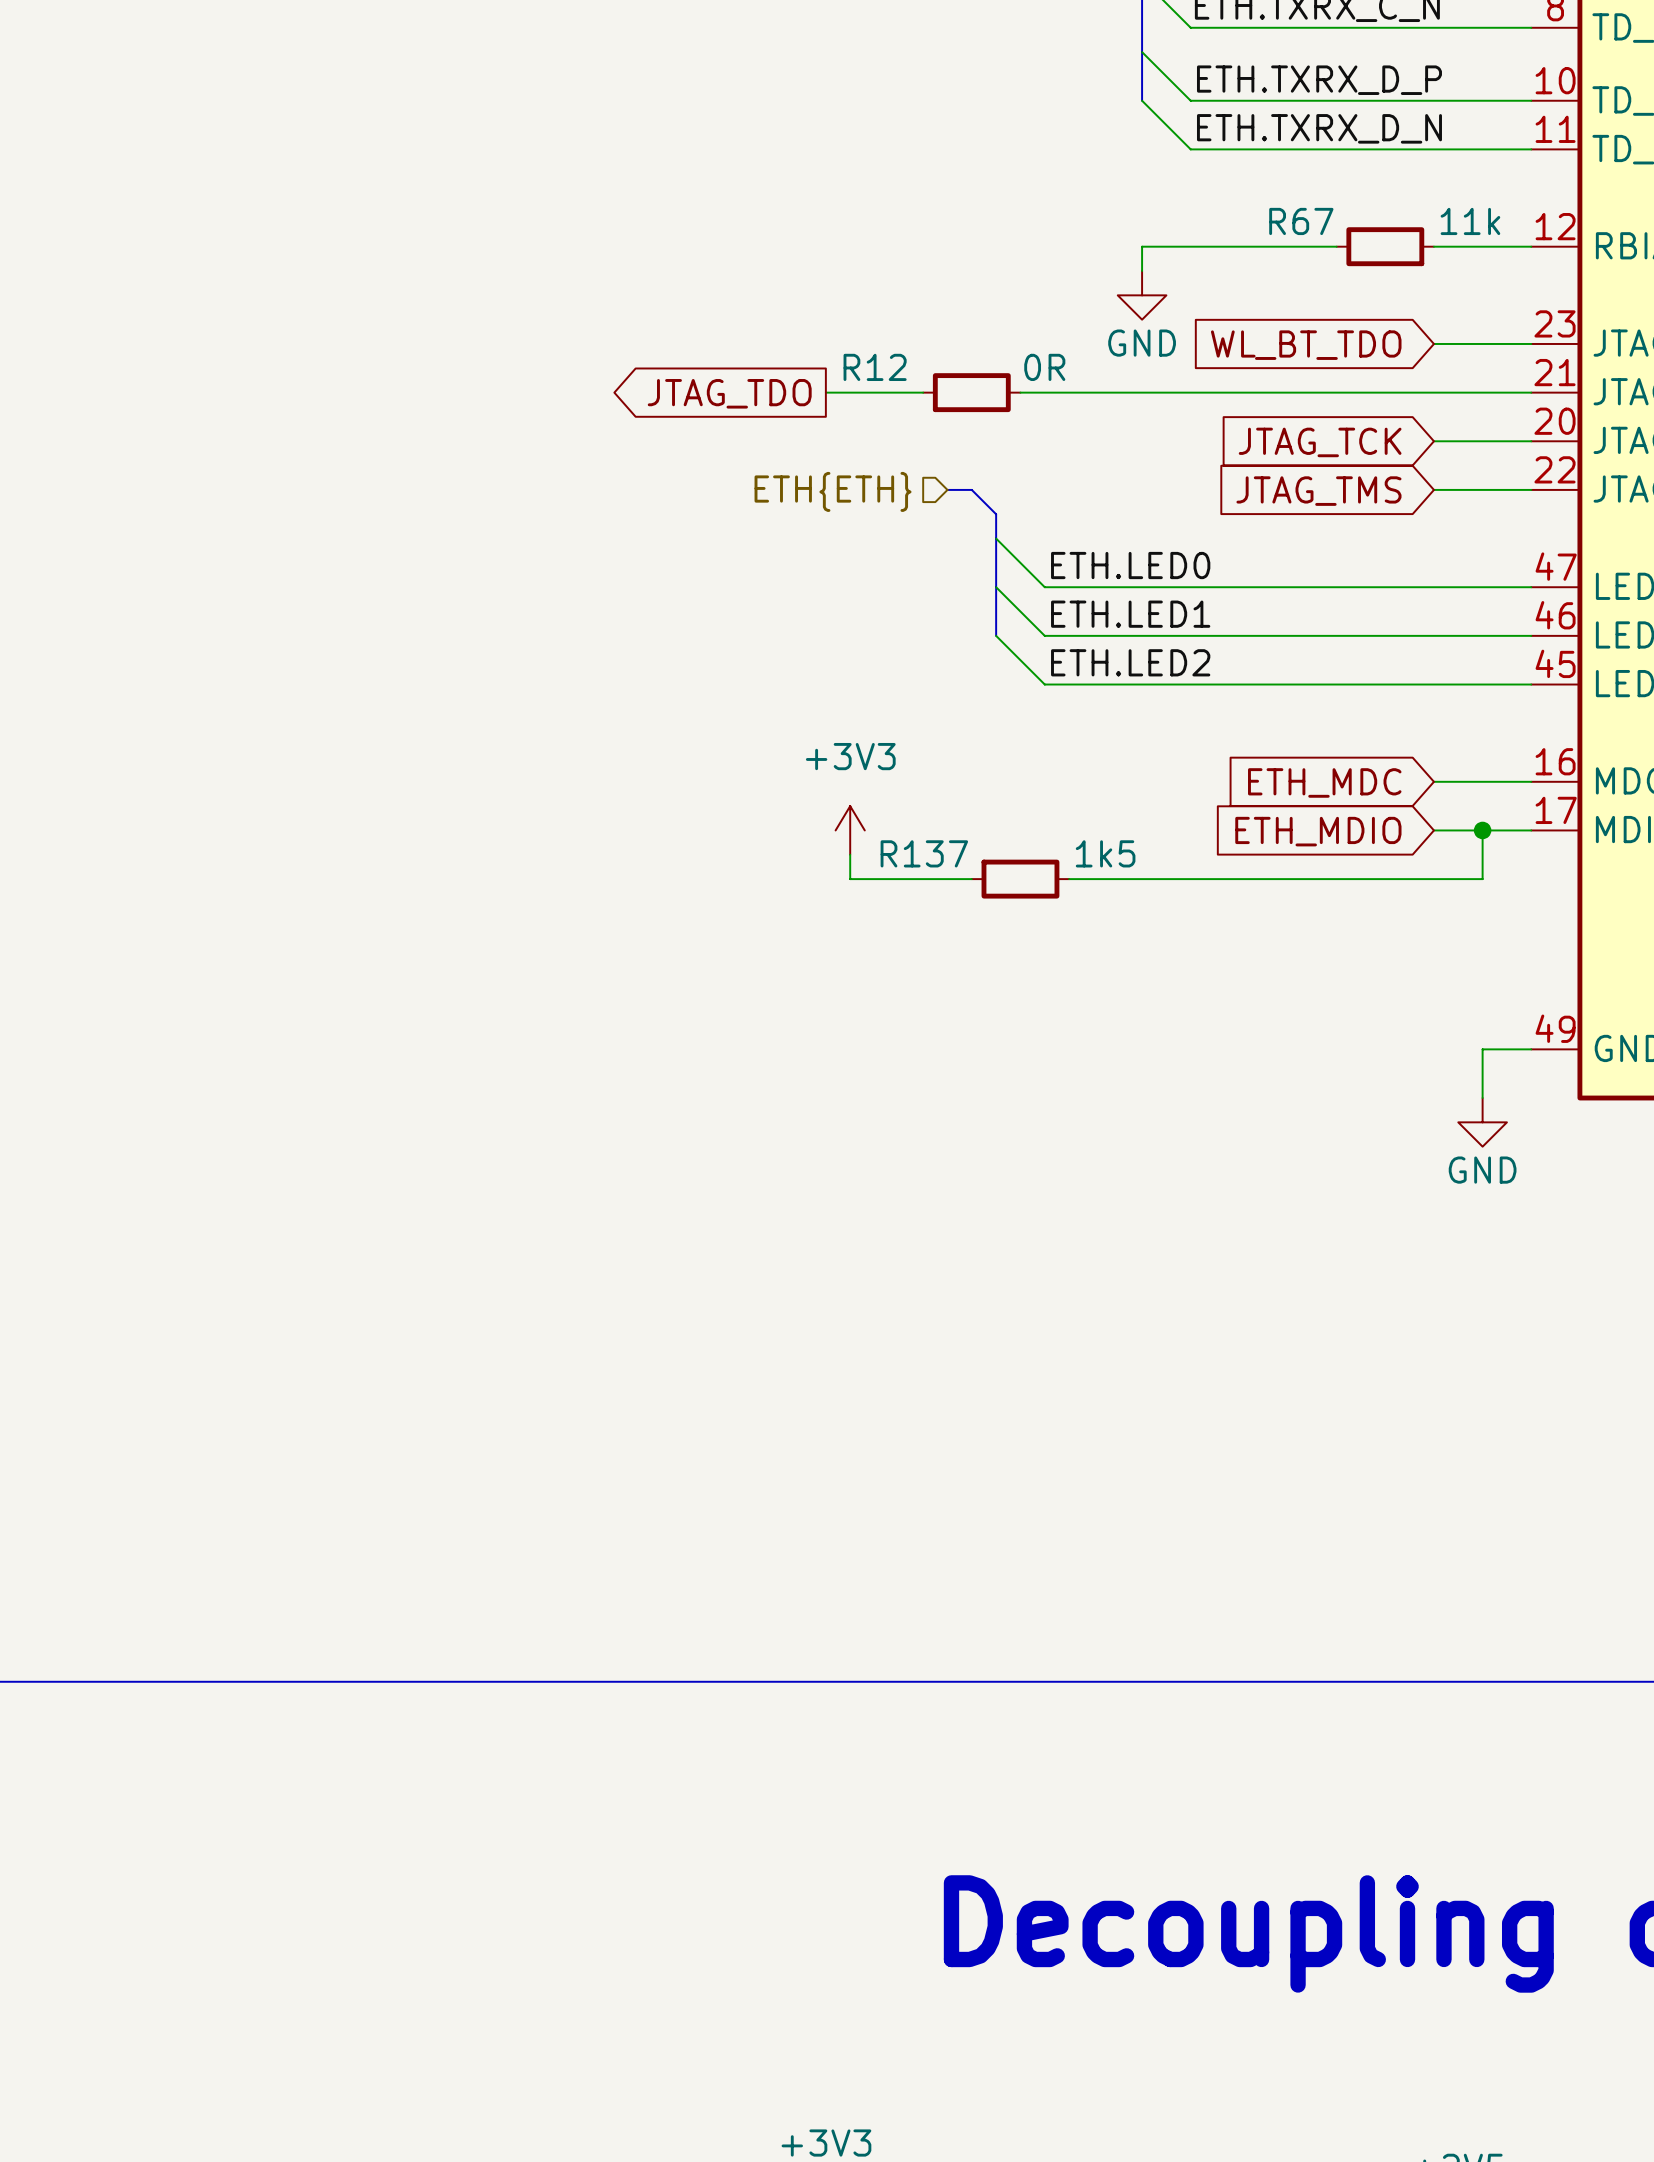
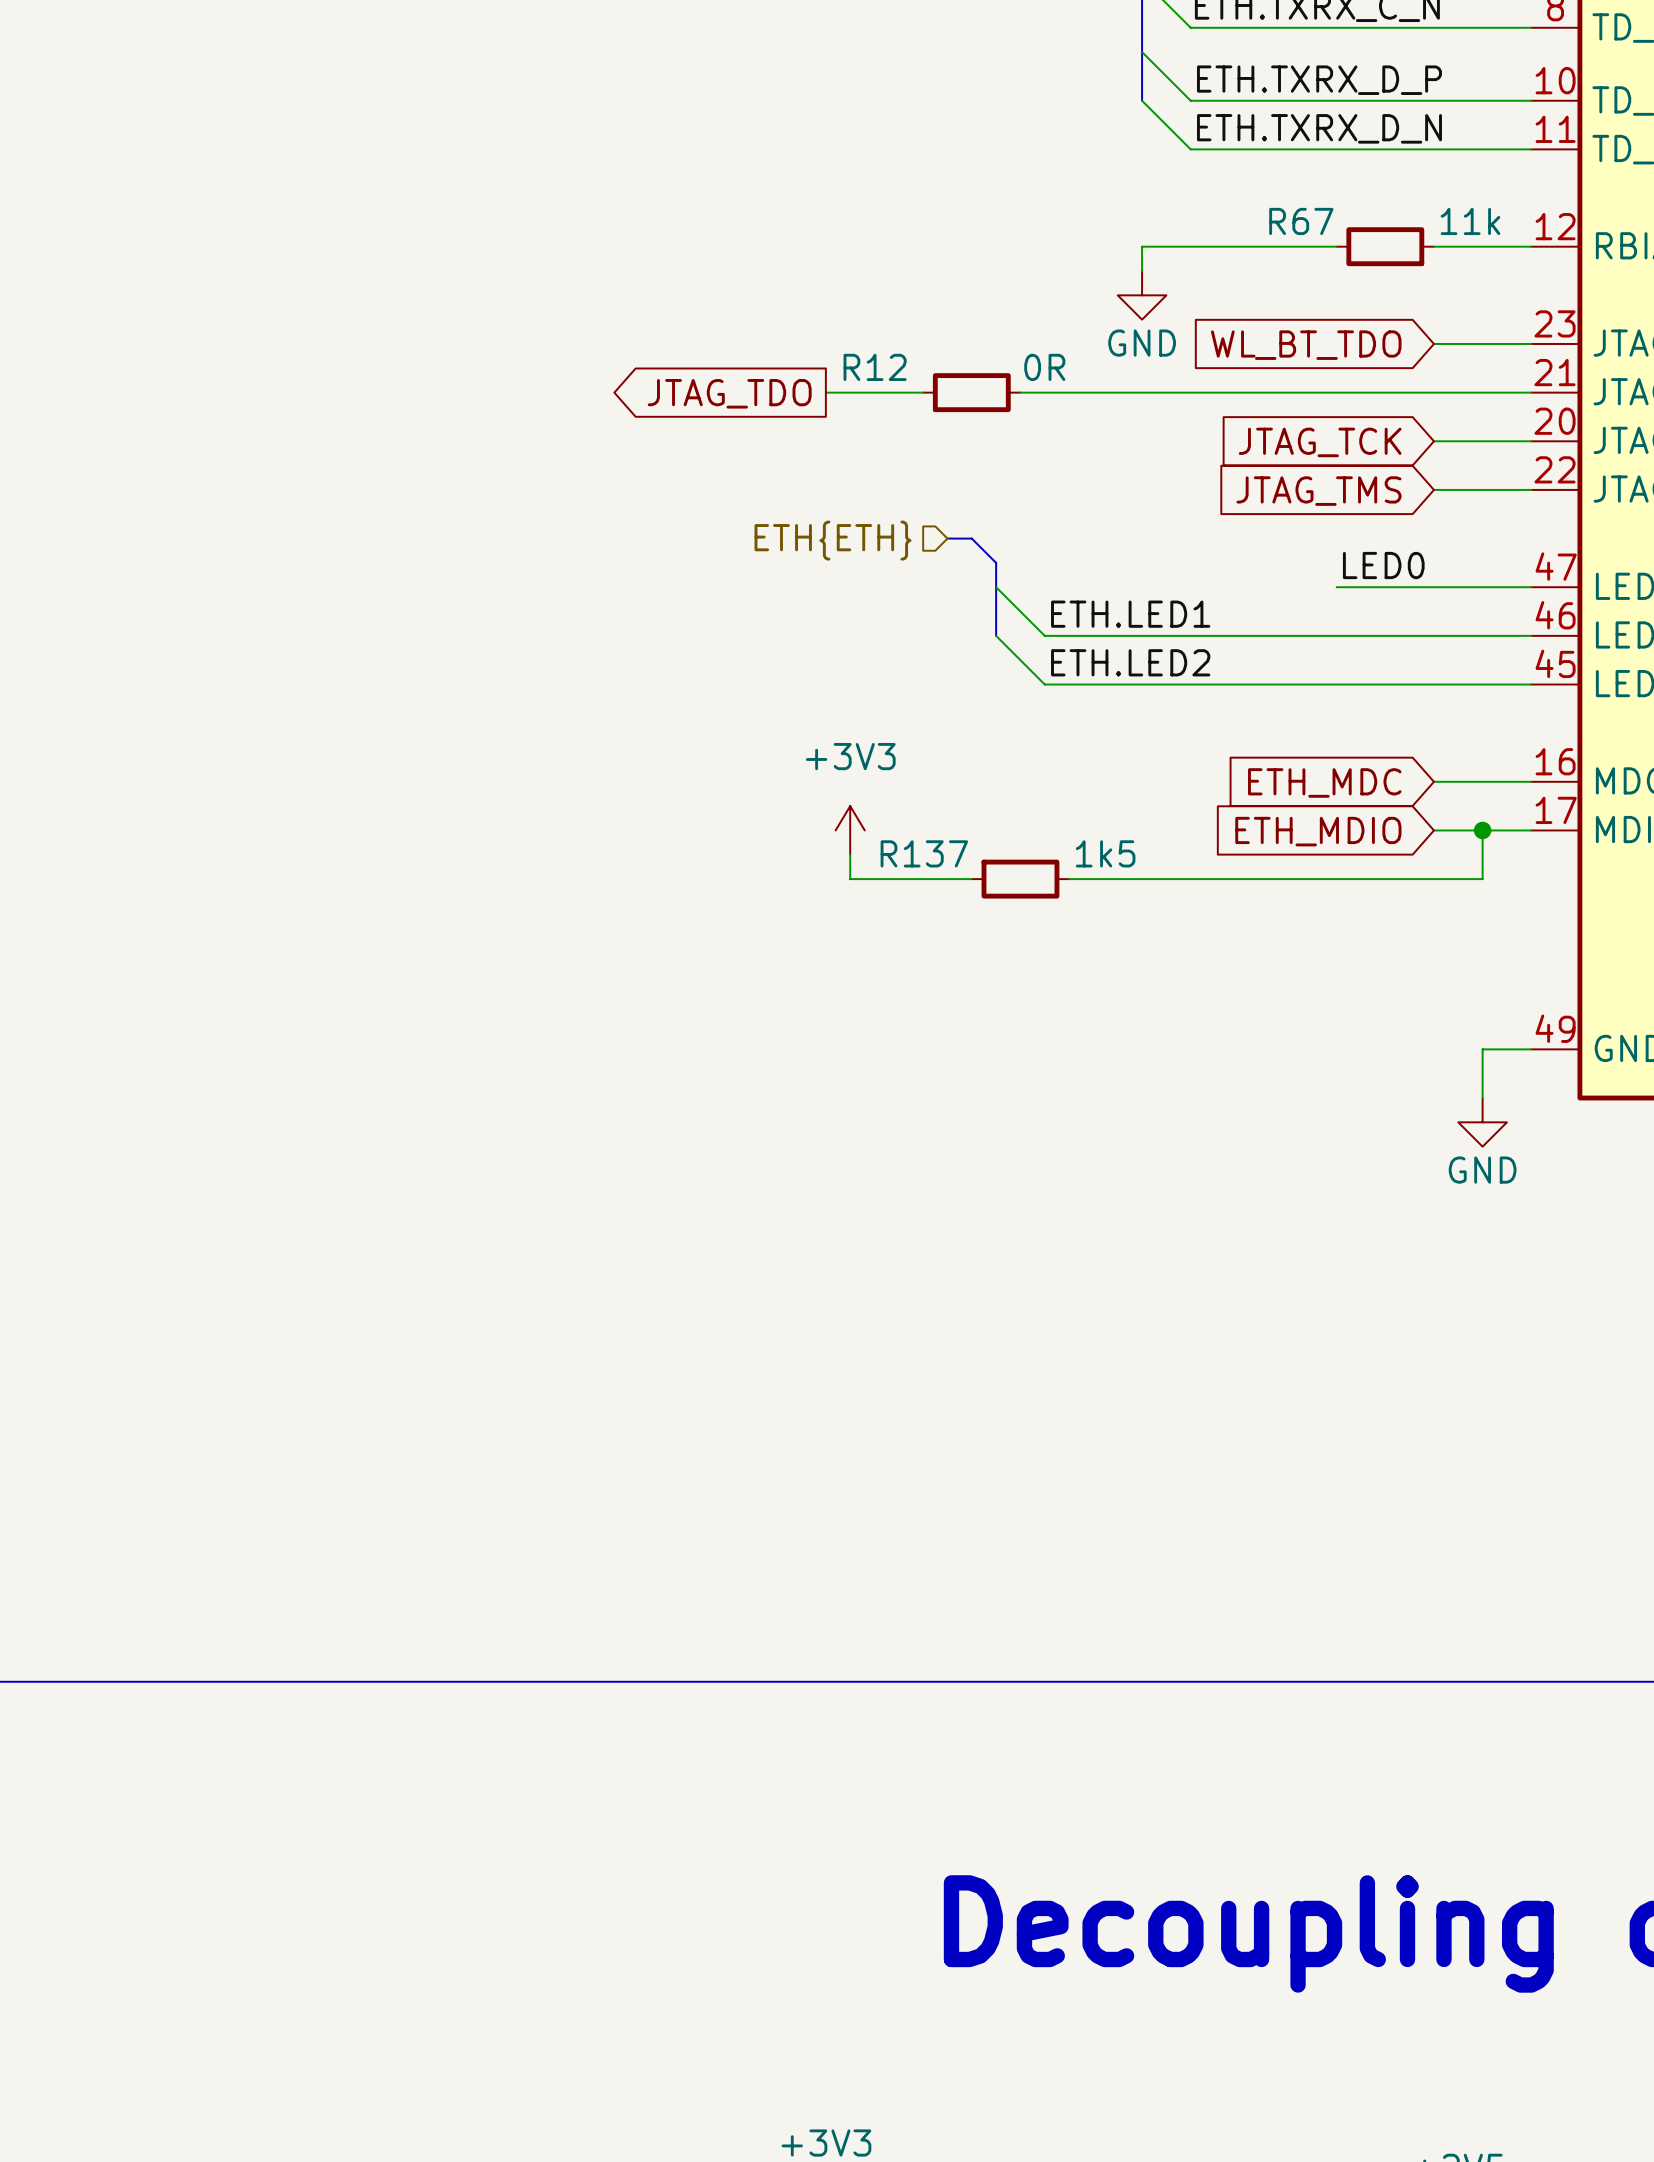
bus: (947, 489) (971, 489) (996, 514) (996, 562) -> (947, 538) (971, 538) (996, 562)
hierarchical label position: ETH{ETH} (833, 491) -> ETH{ETH} (833, 540)
wire: (996, 538) (1044, 587) (1336, 587) -> none
label: ETH.LED0 (1130, 565) -> none
label: none -> LED0 (1383, 565)

